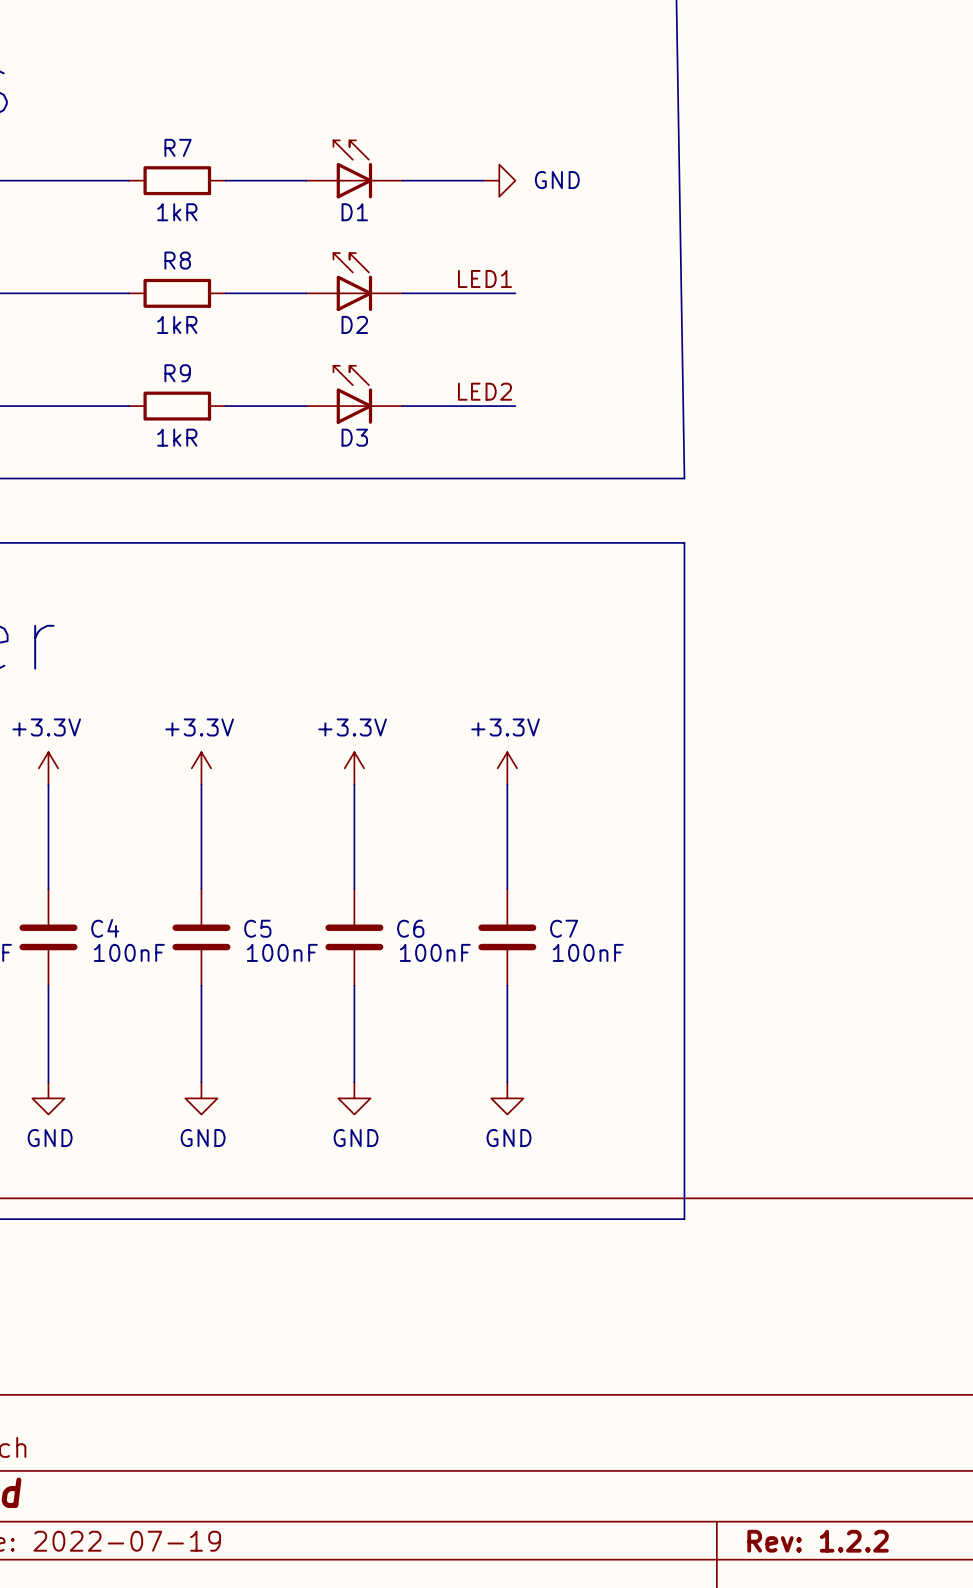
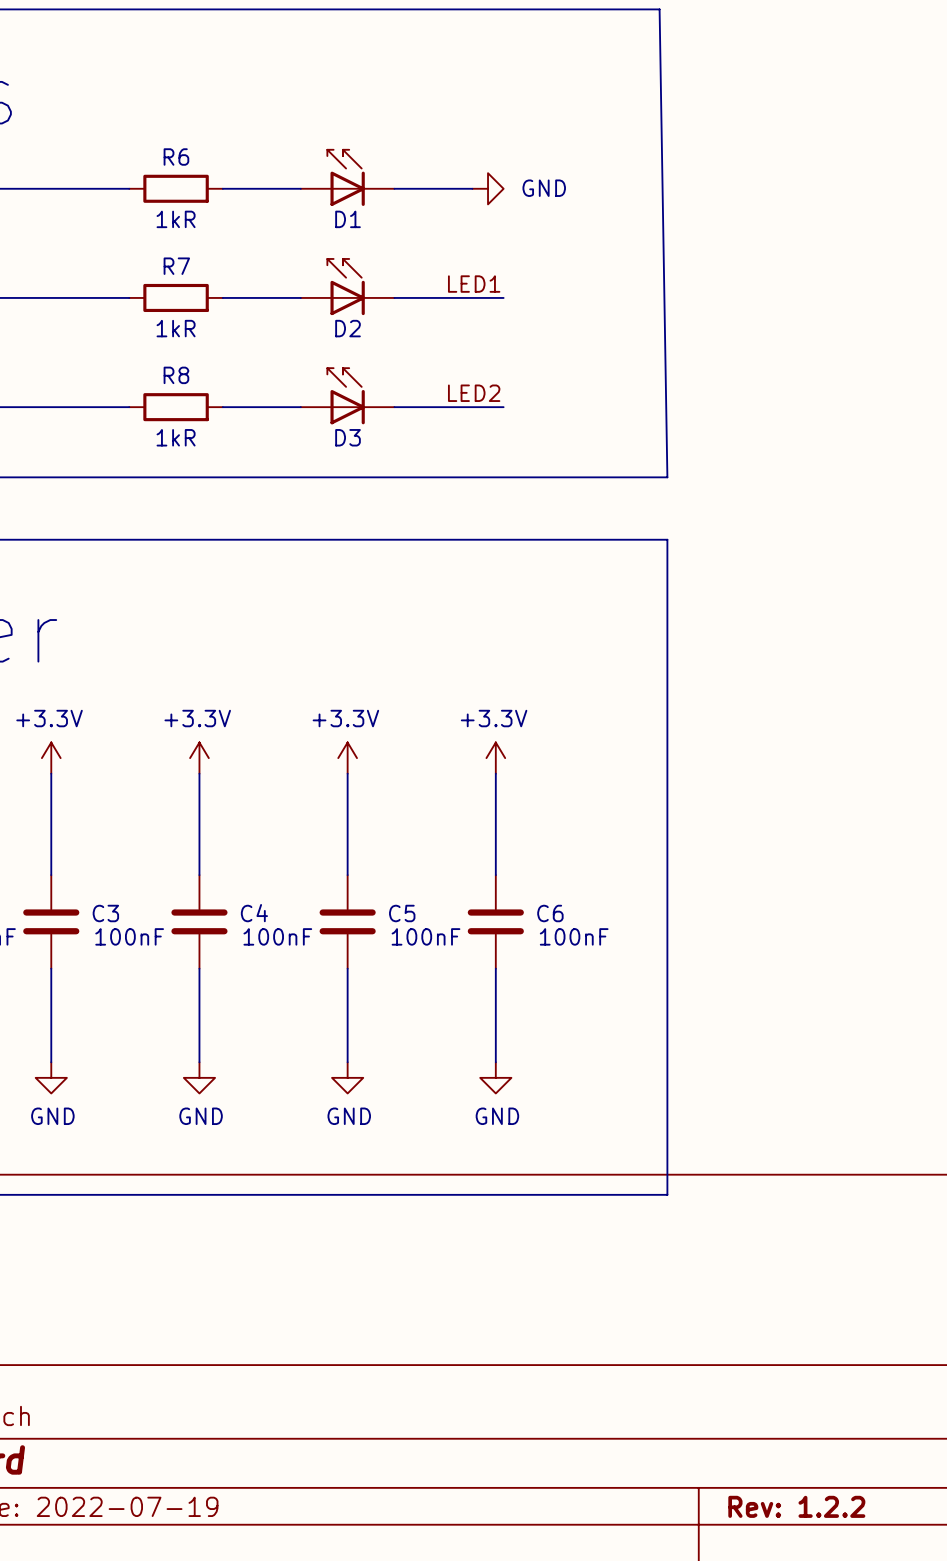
R7 name: R7 (178, 147) -> R6 (176, 157)
R8 name: R8 (177, 260) -> R7 (176, 266)
R9 name: R9 (177, 373) -> R8 (176, 375)
C4 name: C4 (105, 928) -> C3 (105, 913)
C5 name: C5 (257, 928) -> C4 (254, 913)
C6 name: C6 (410, 928) -> C5 (402, 913)
C7 name: C7 (564, 928) -> C6 (550, 913)

